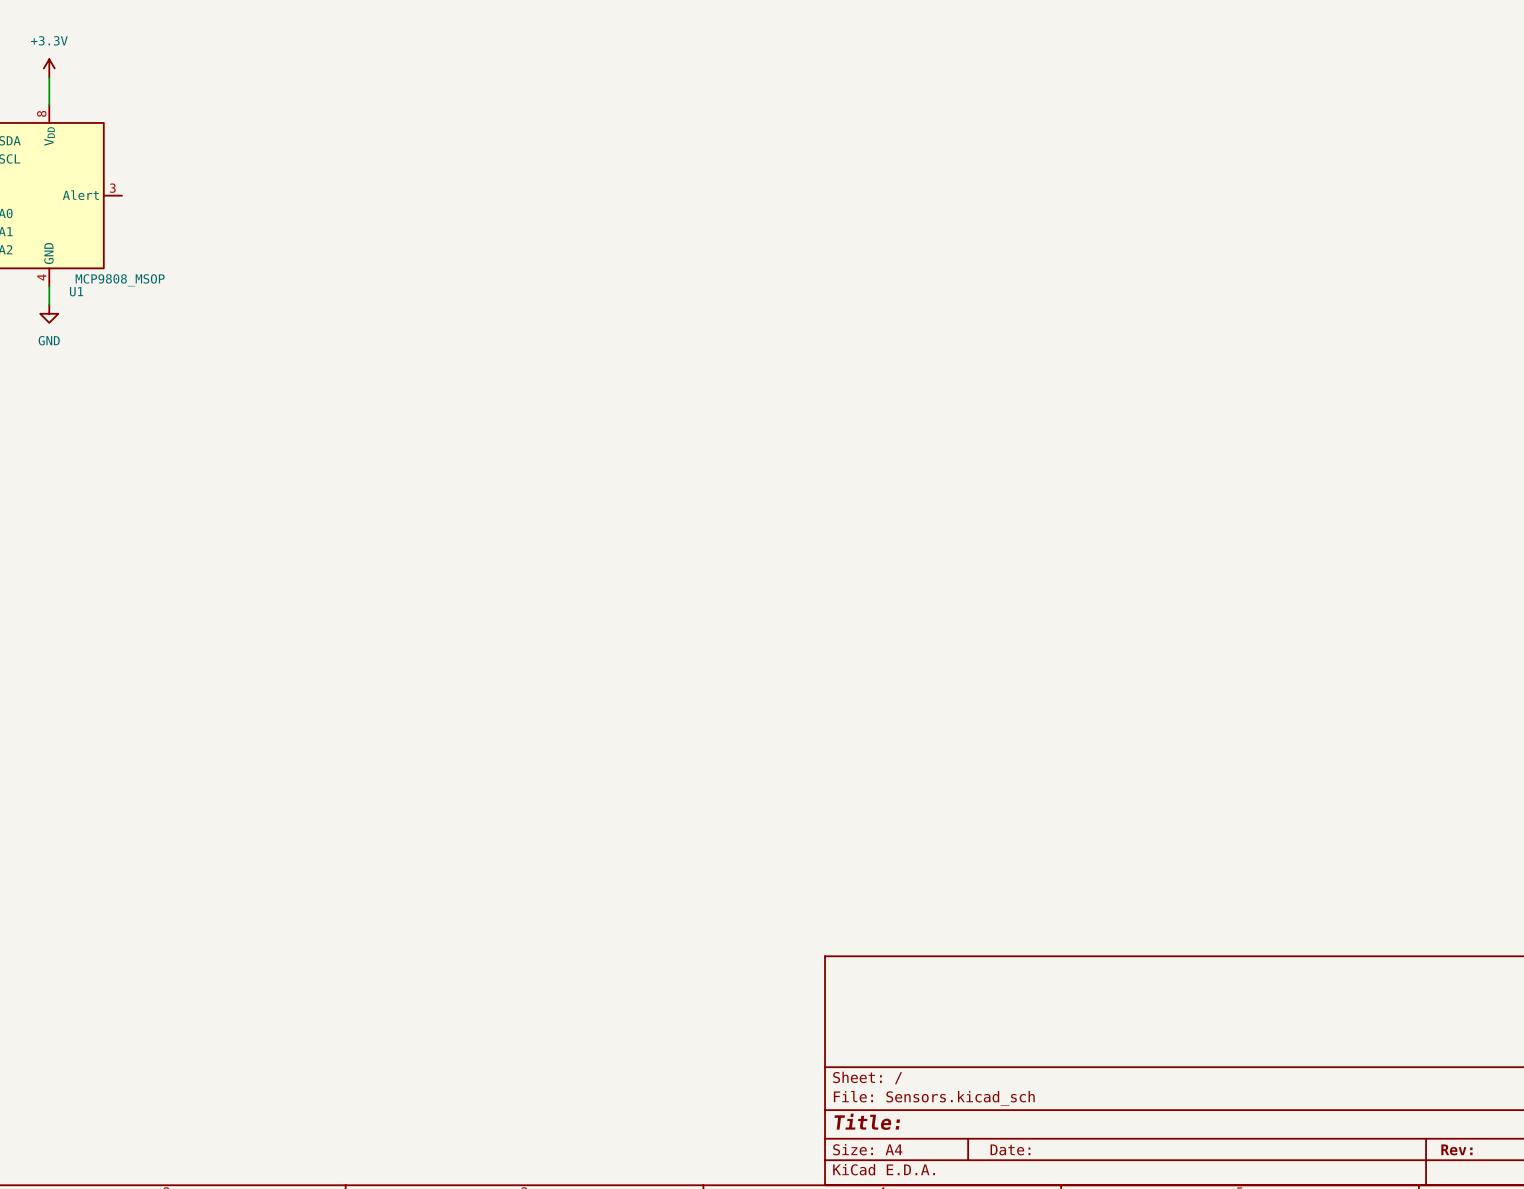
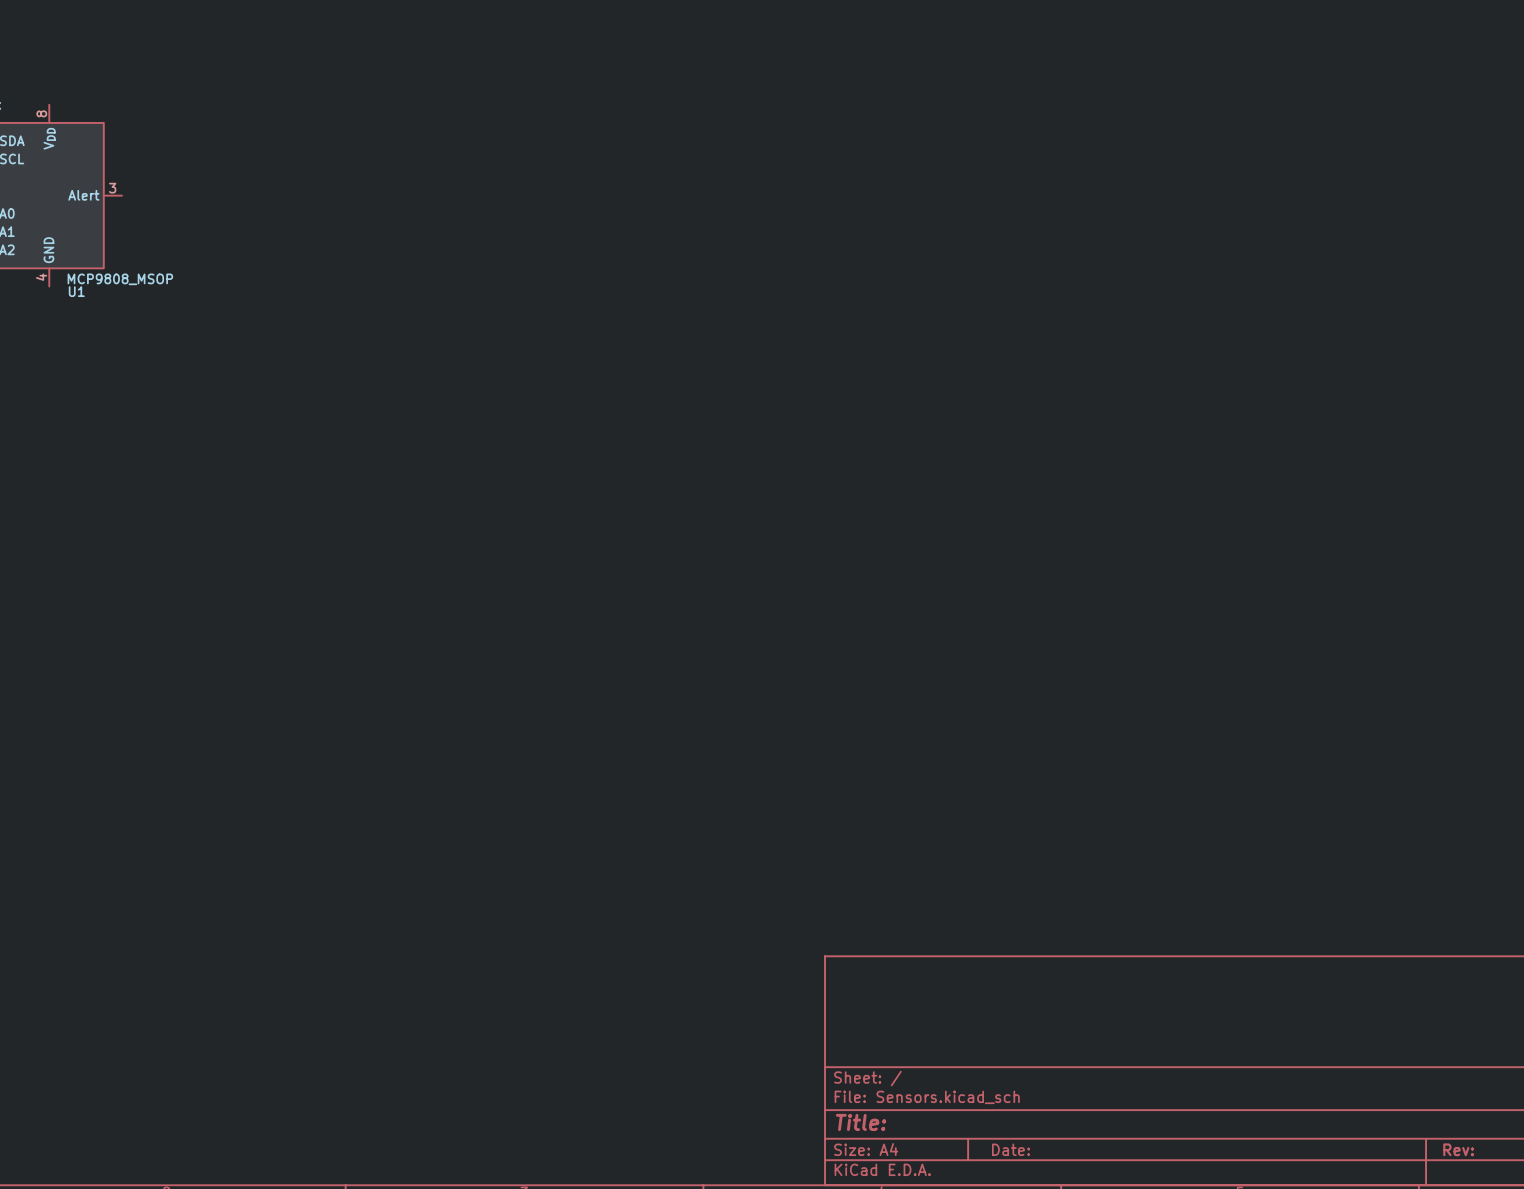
power symbol: +3.3V (49, 68) -> none
wire: (49, 77) (49, 104) -> none
wire: (49, 286) (49, 304) -> none
power symbol: GND (49, 313) -> none

